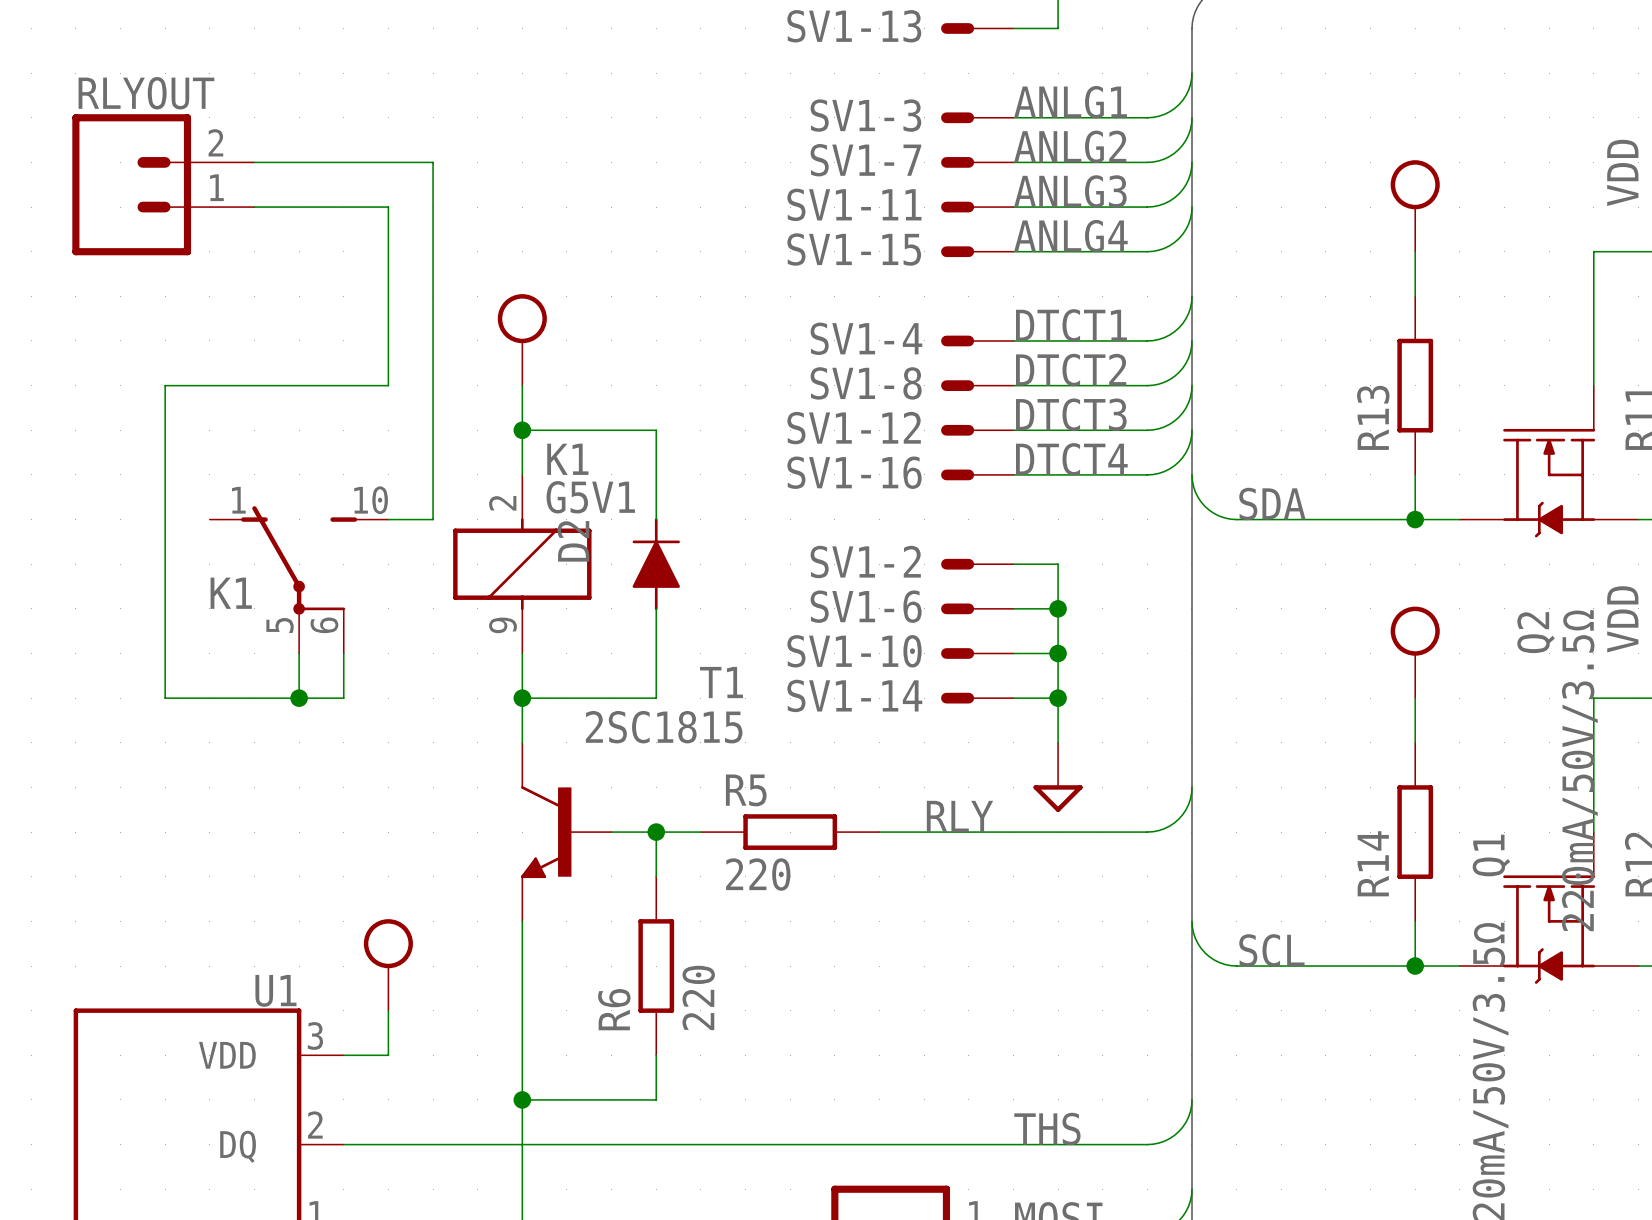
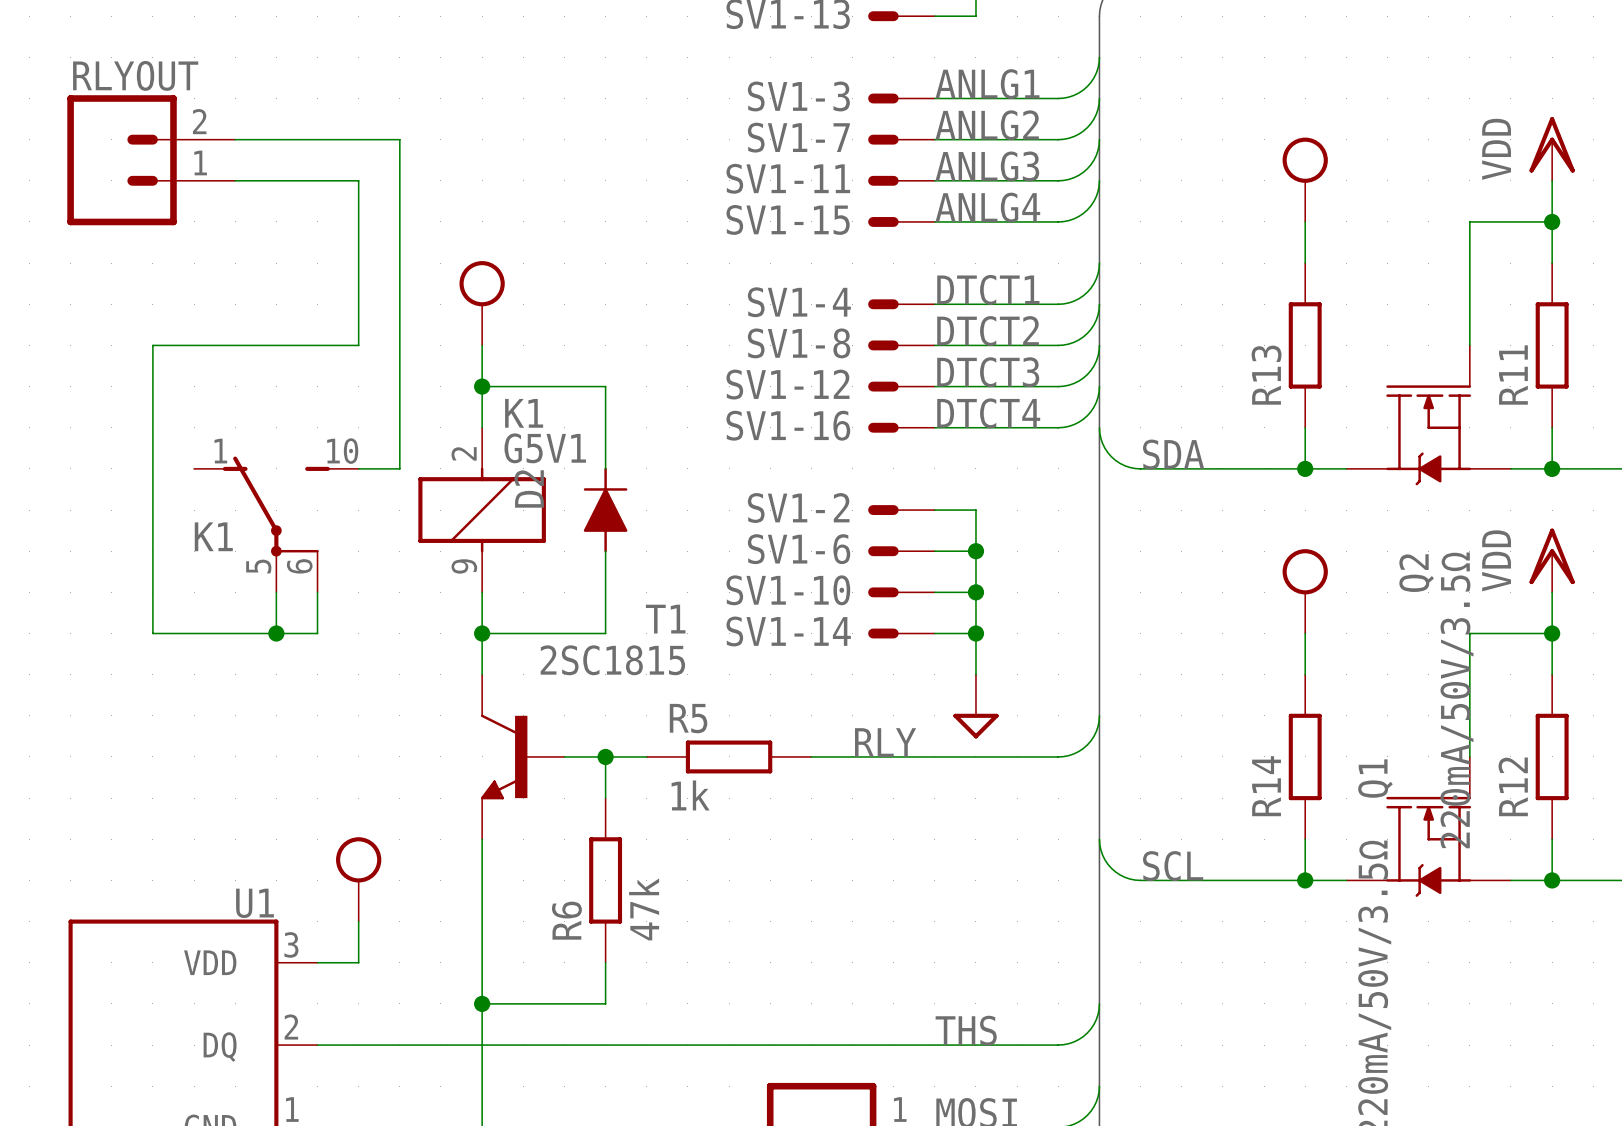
R5 value: 220 (758, 874) -> 1k (690, 795)
R6 value: 220 (698, 997) -> 47k (644, 909)

